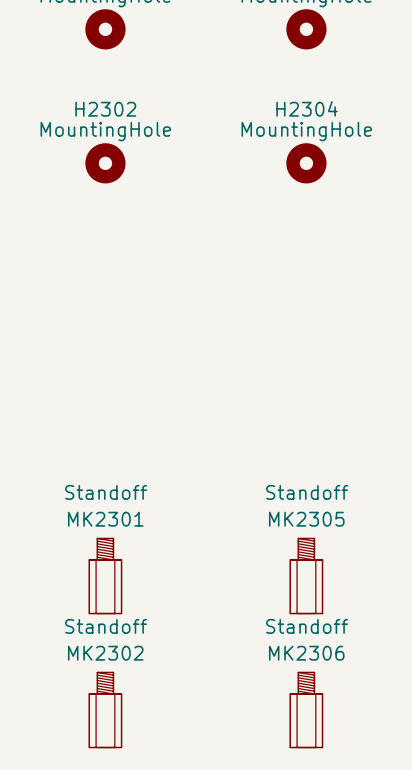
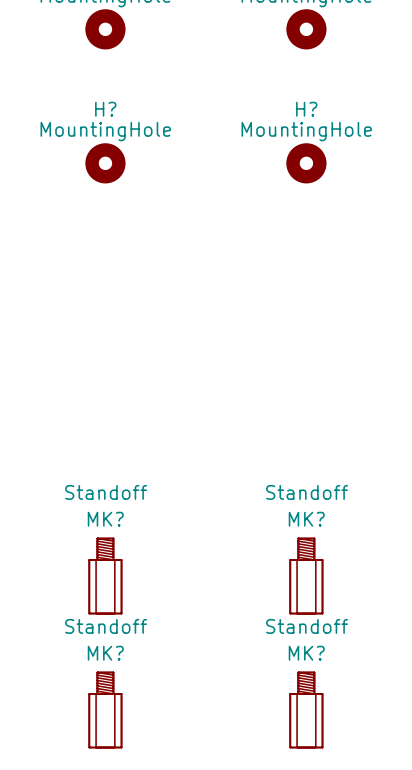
H2304 name: H2304 (307, 108) -> H? (306, 109)
H2302 name: H2302 (105, 109) -> H? (105, 109)
MK2301 name: MK2301 (105, 519) -> MK? (105, 519)
MK2305 name: MK2305 (306, 519) -> MK? (306, 519)
MK2302 name: MK2302 (105, 653) -> MK? (105, 653)
MK2306 name: MK2306 (306, 653) -> MK? (306, 653)

